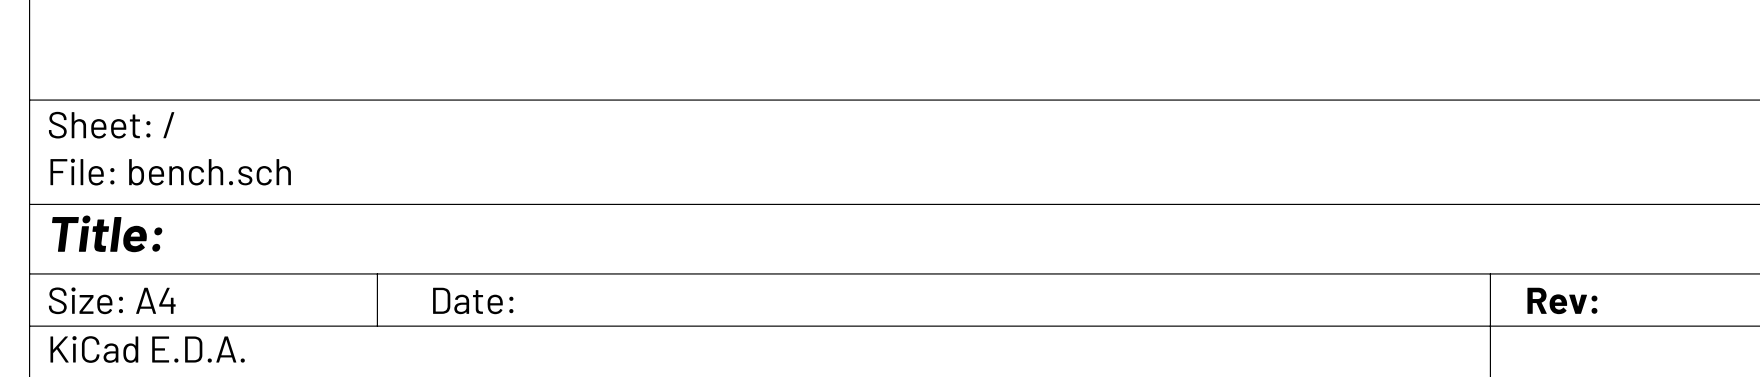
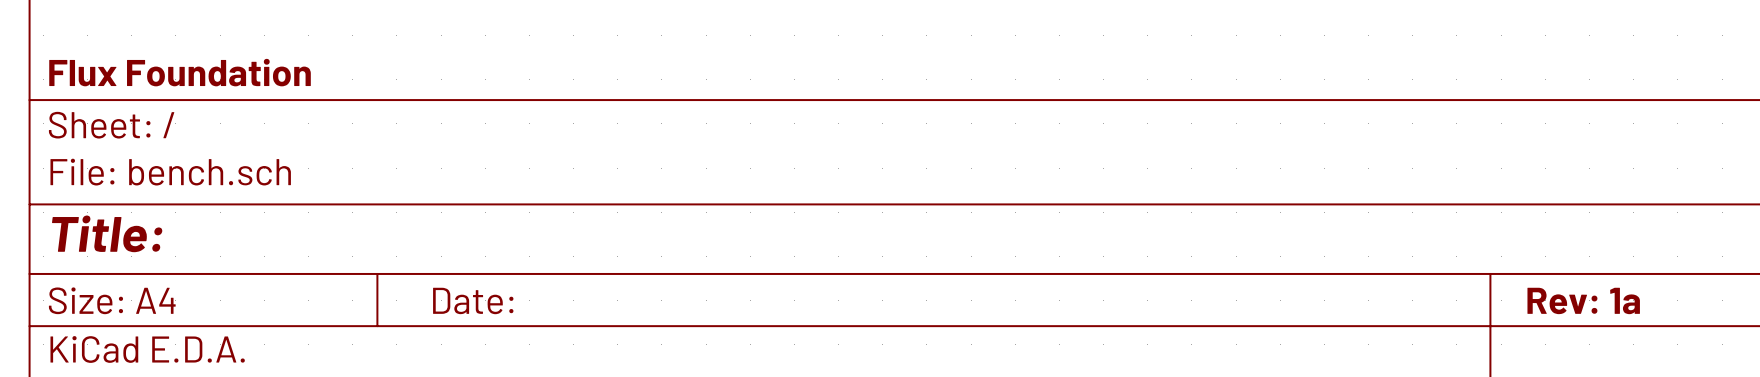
title block: none -> Flux Foundation (180, 72)
title block: Rev: (1562, 300) -> Rev: 1a (1583, 300)

